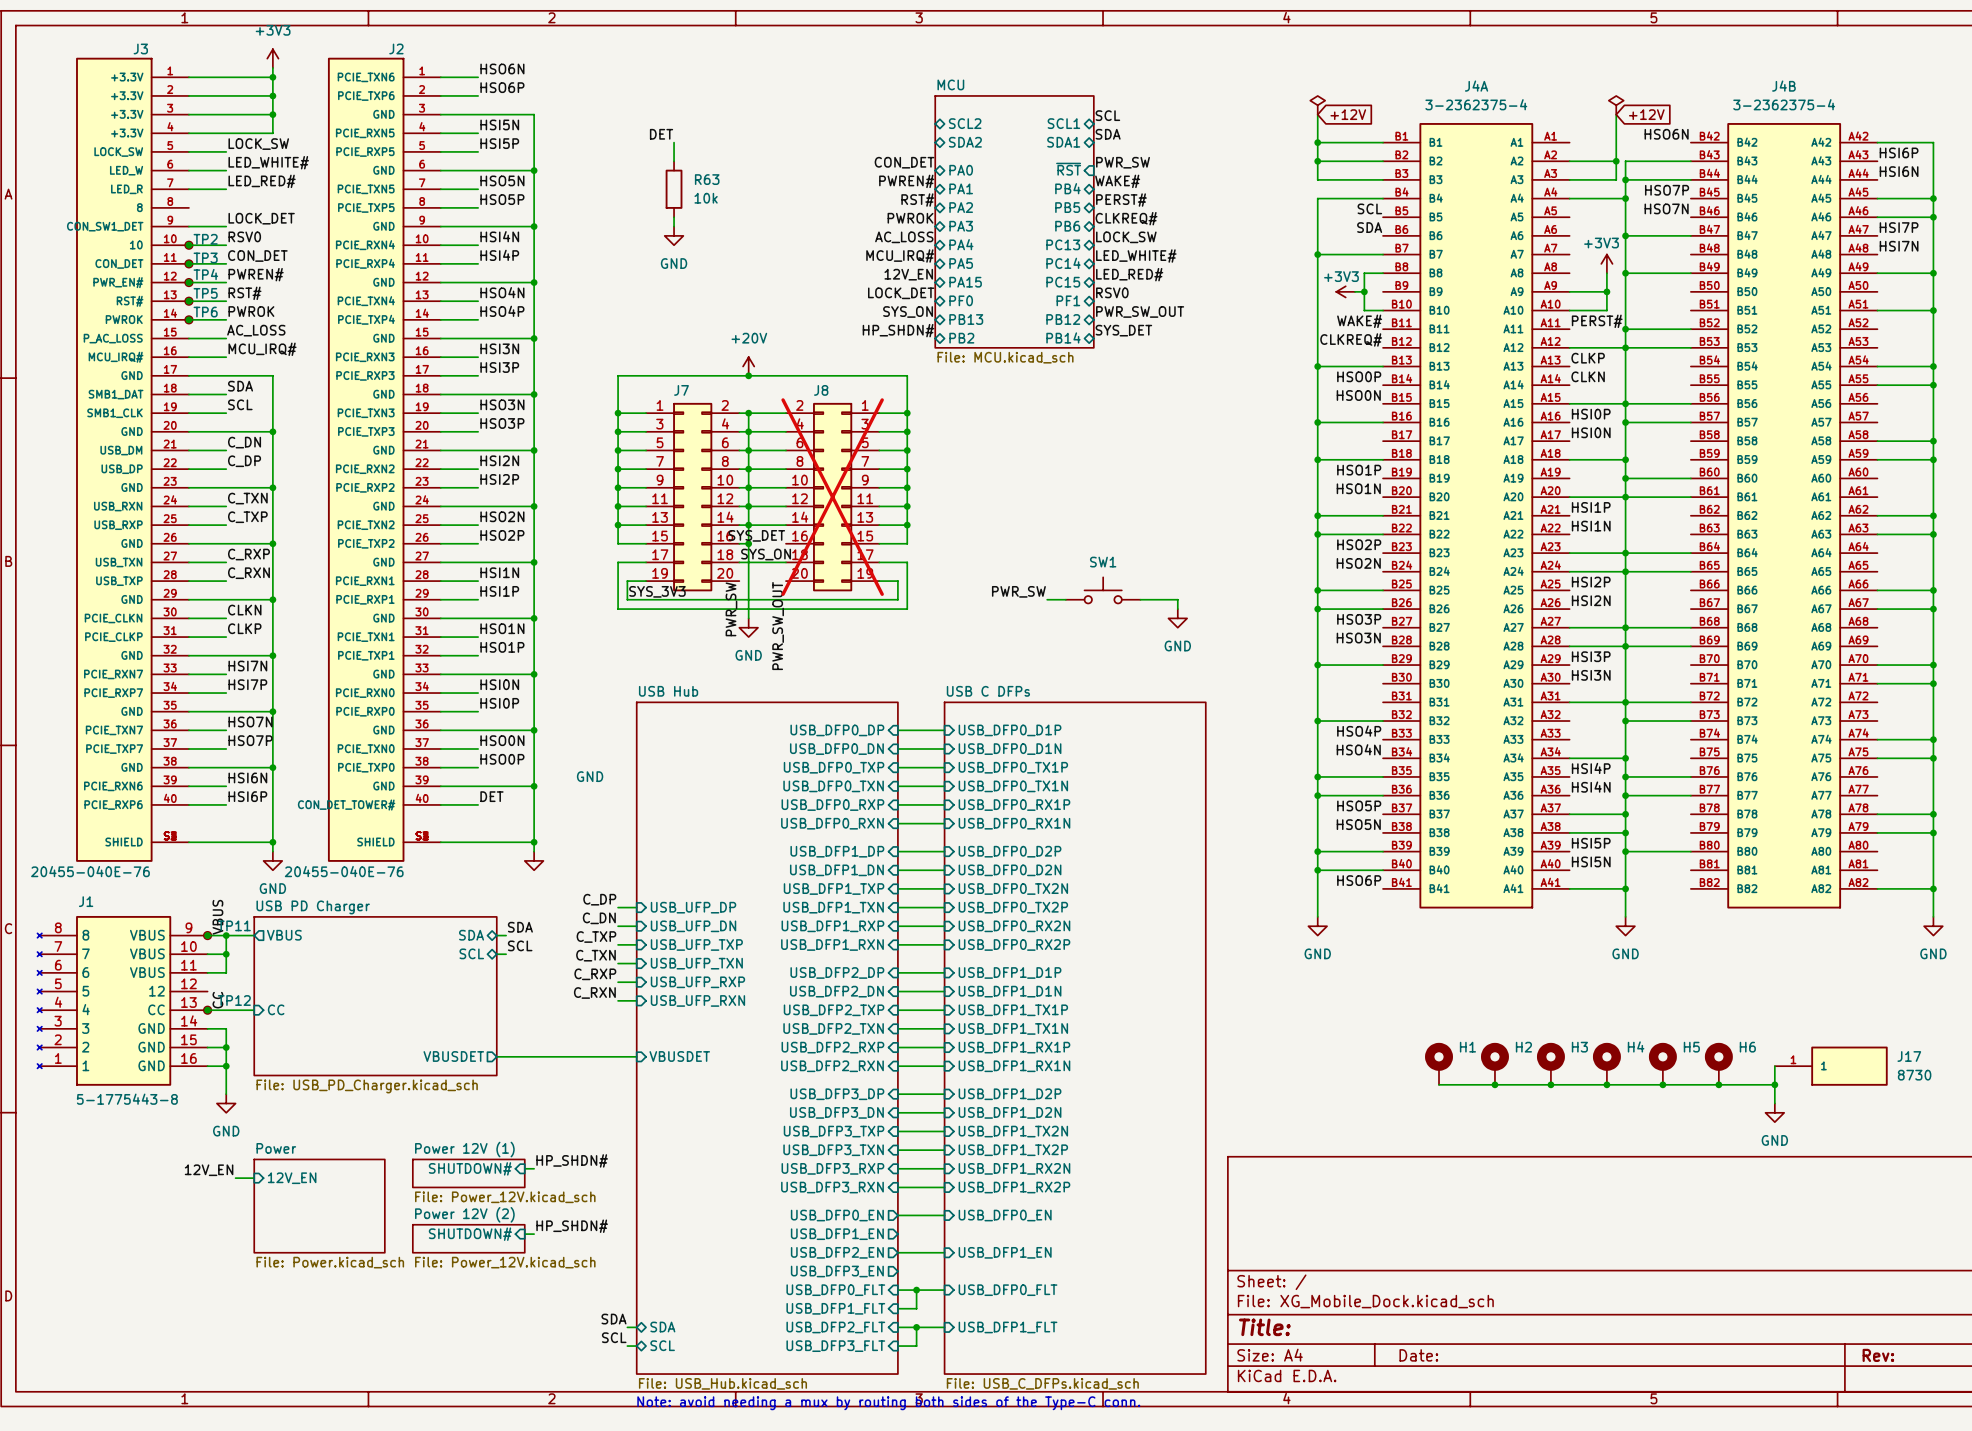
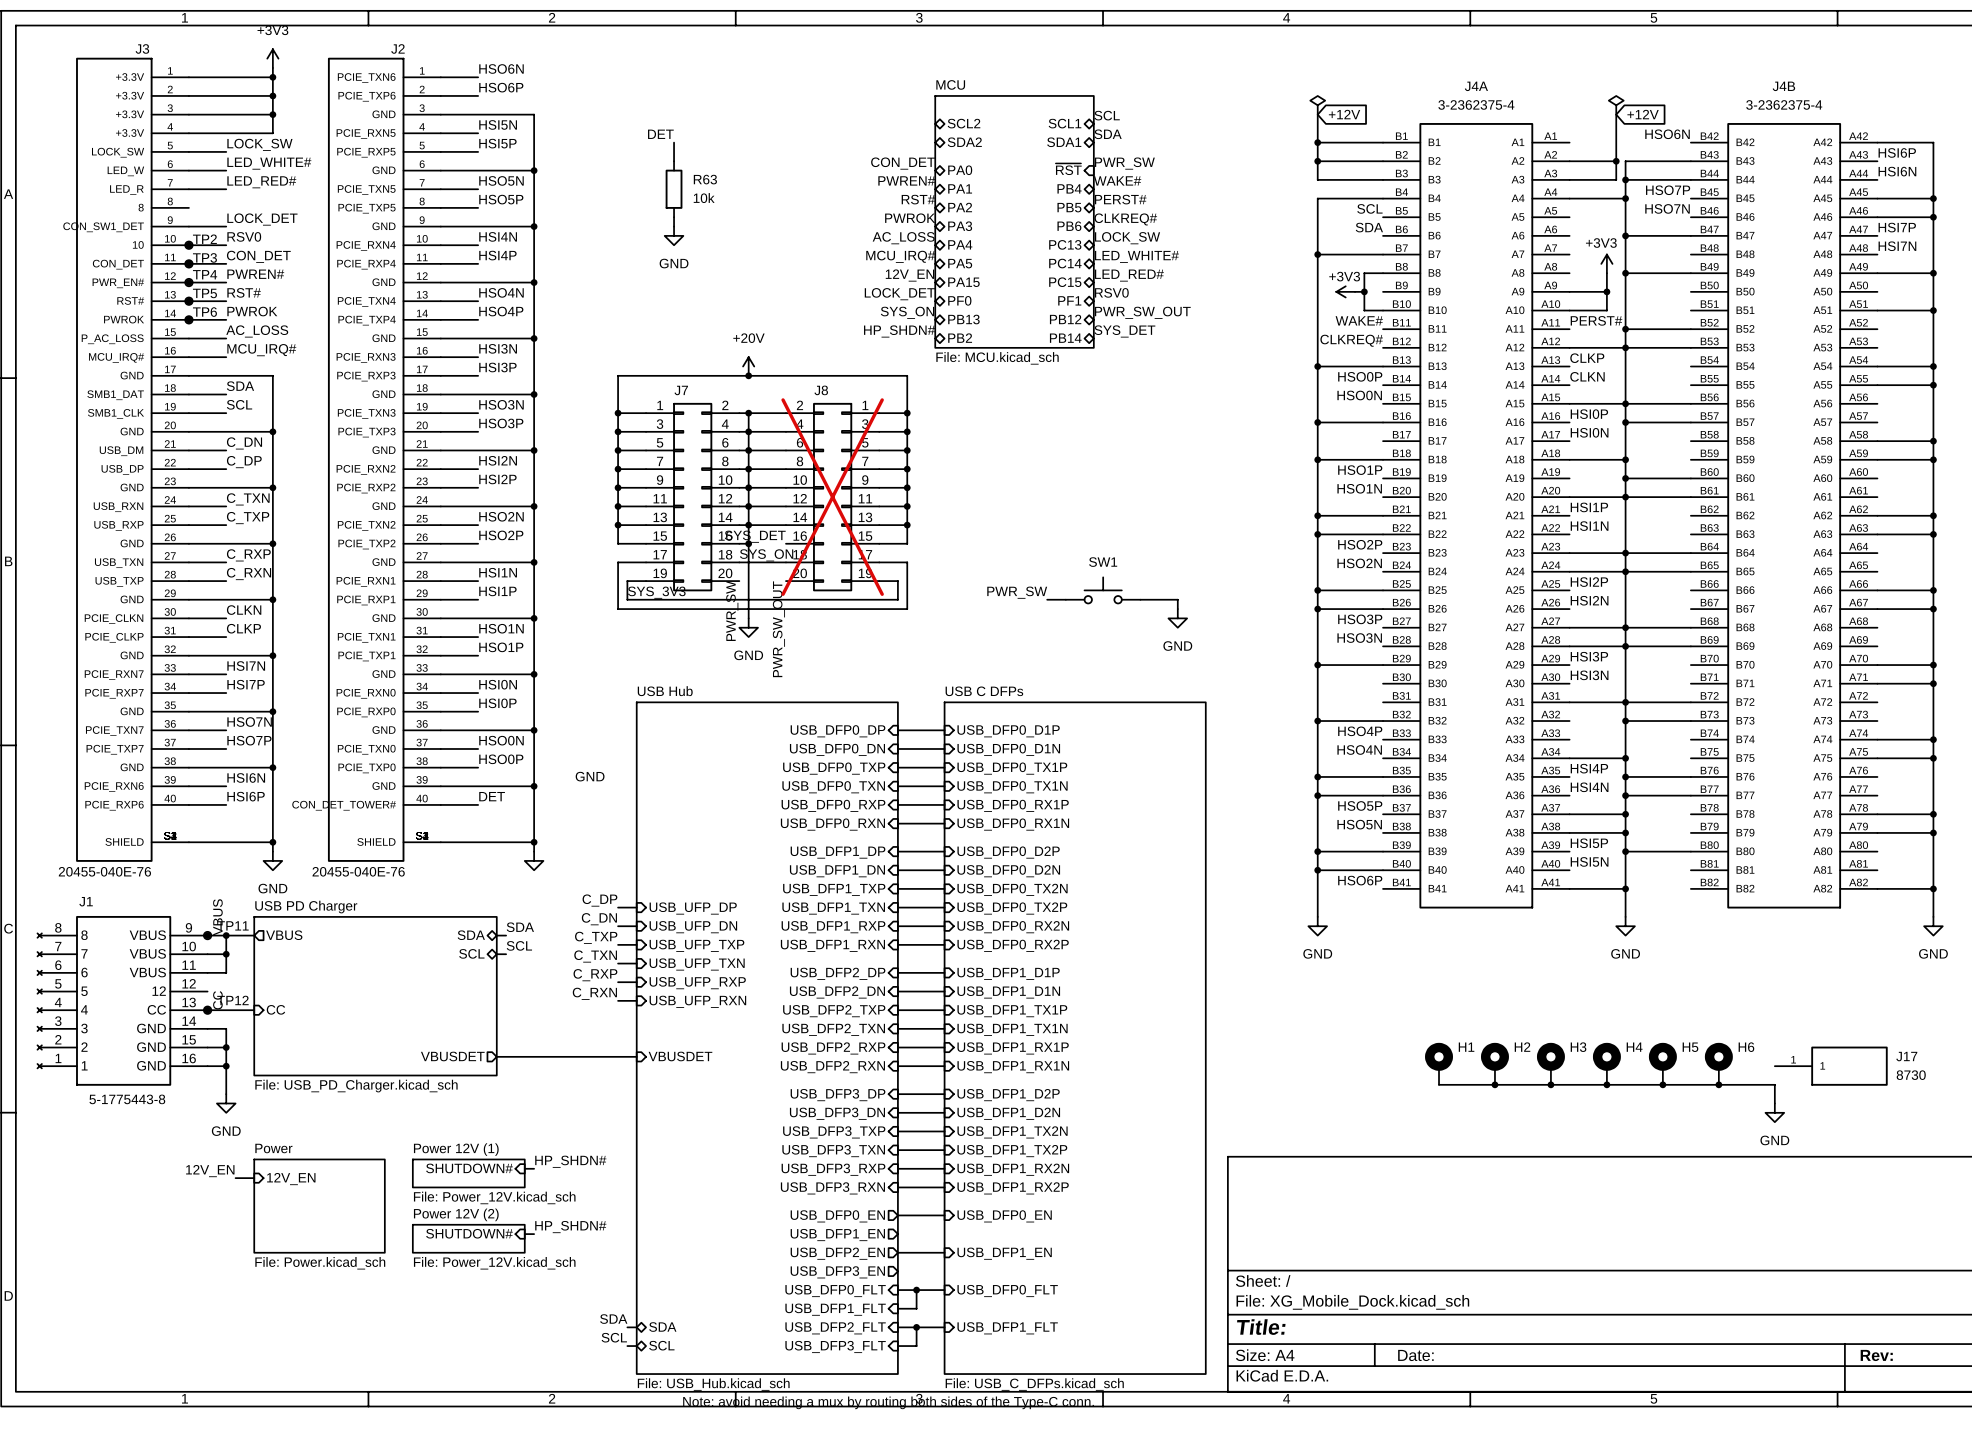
wire: (1774, 1066) (1774, 1084) -> none
junction: (1774, 1084) -> none

